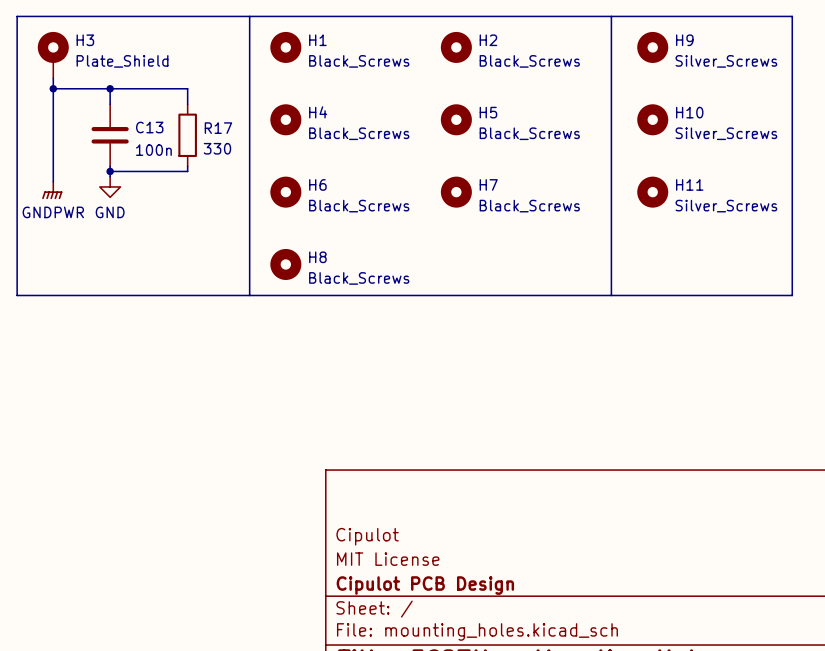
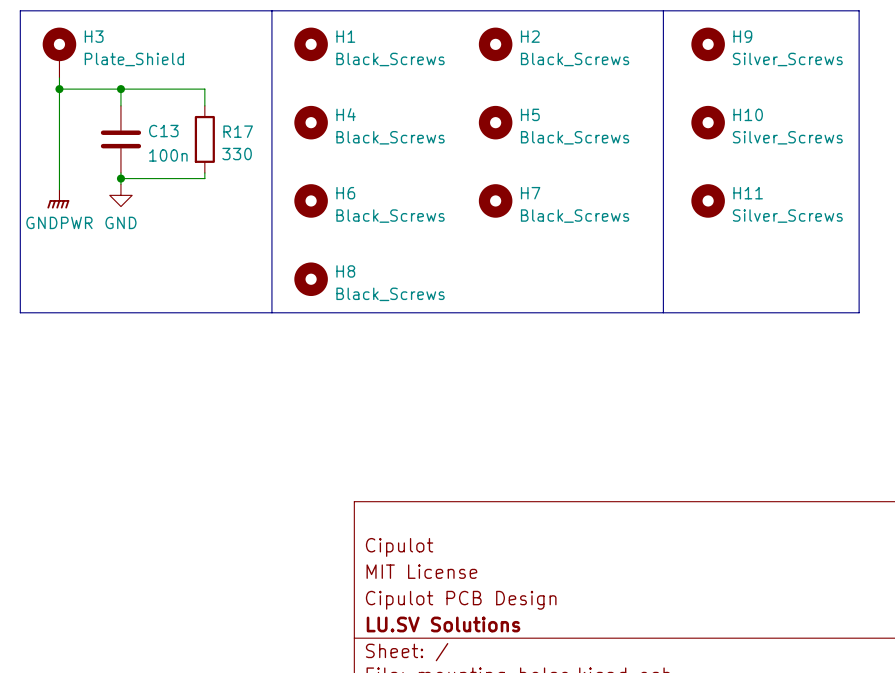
title block: none -> Cipulot (399, 547)
title block: Cipulot (367, 536) -> MIT License (421, 571)
title block: MIT License (388, 559) -> Cipulot PCB Design (461, 600)
title block: Cipulot PCB Design (425, 585) -> LU.SV Solutions (443, 624)

